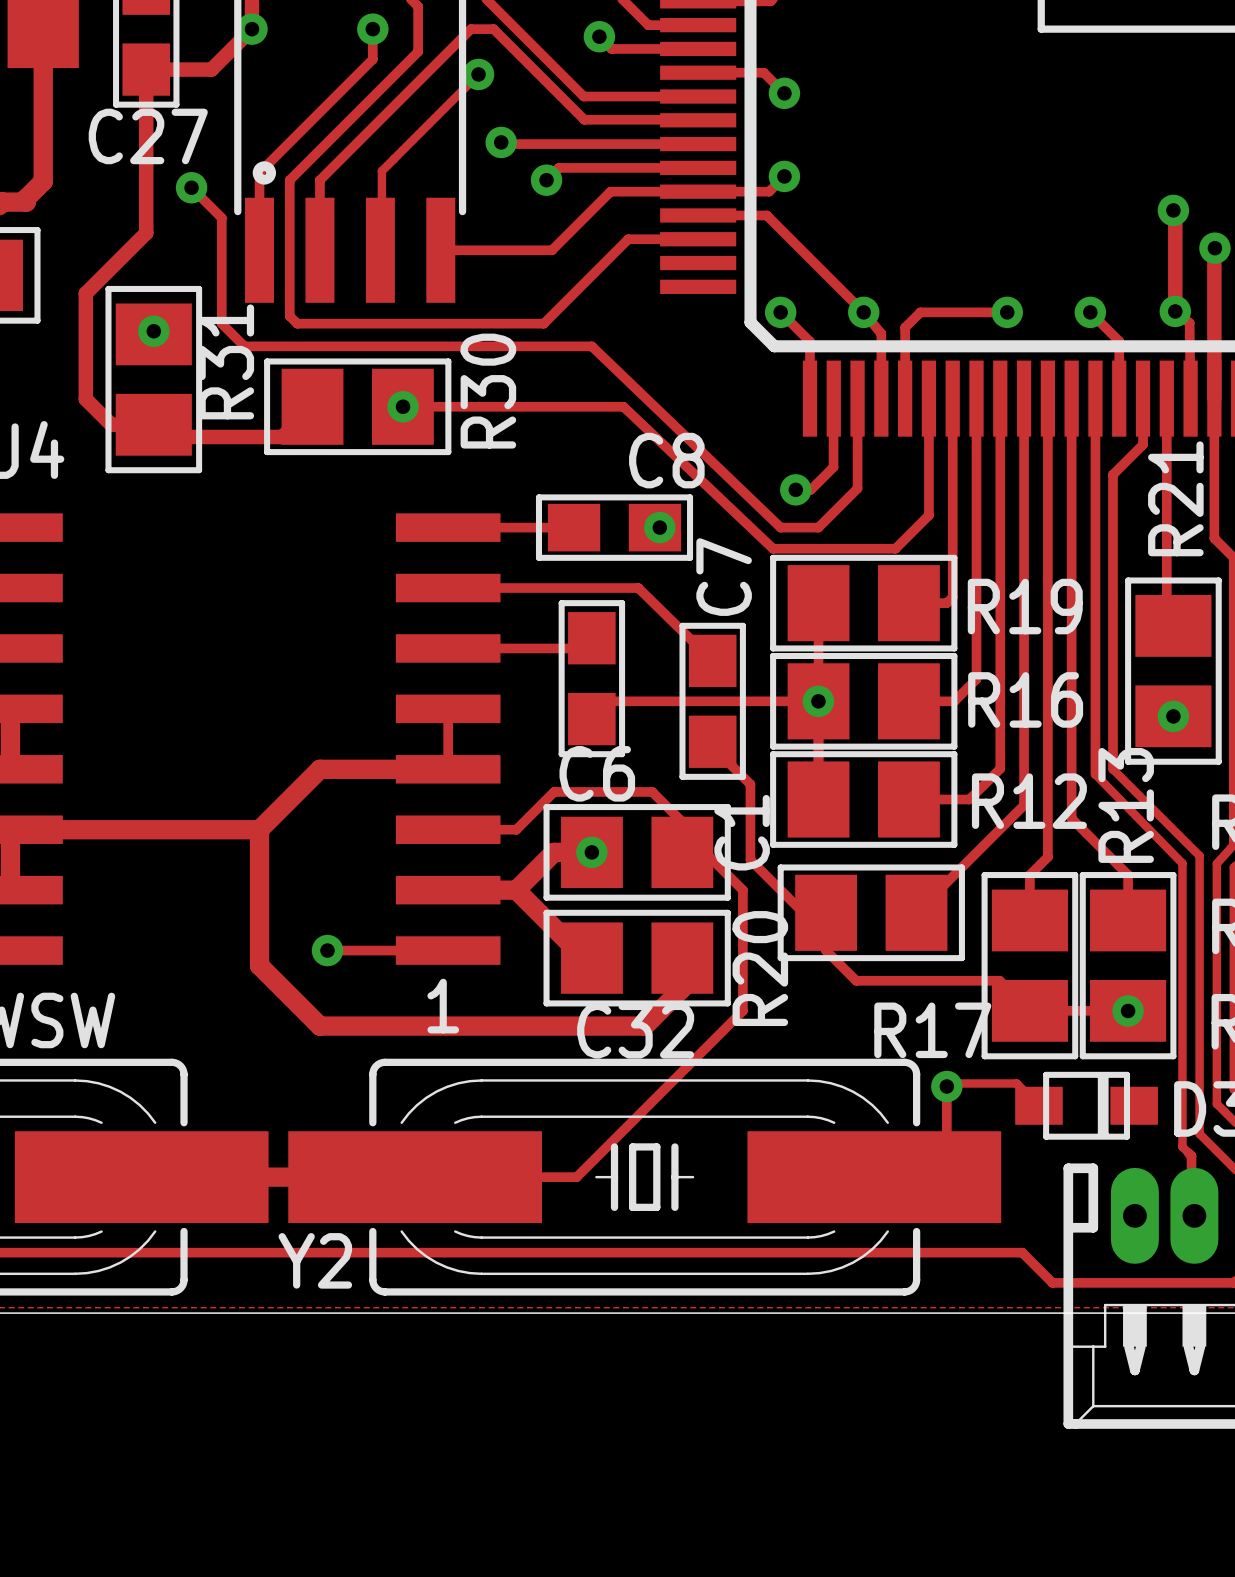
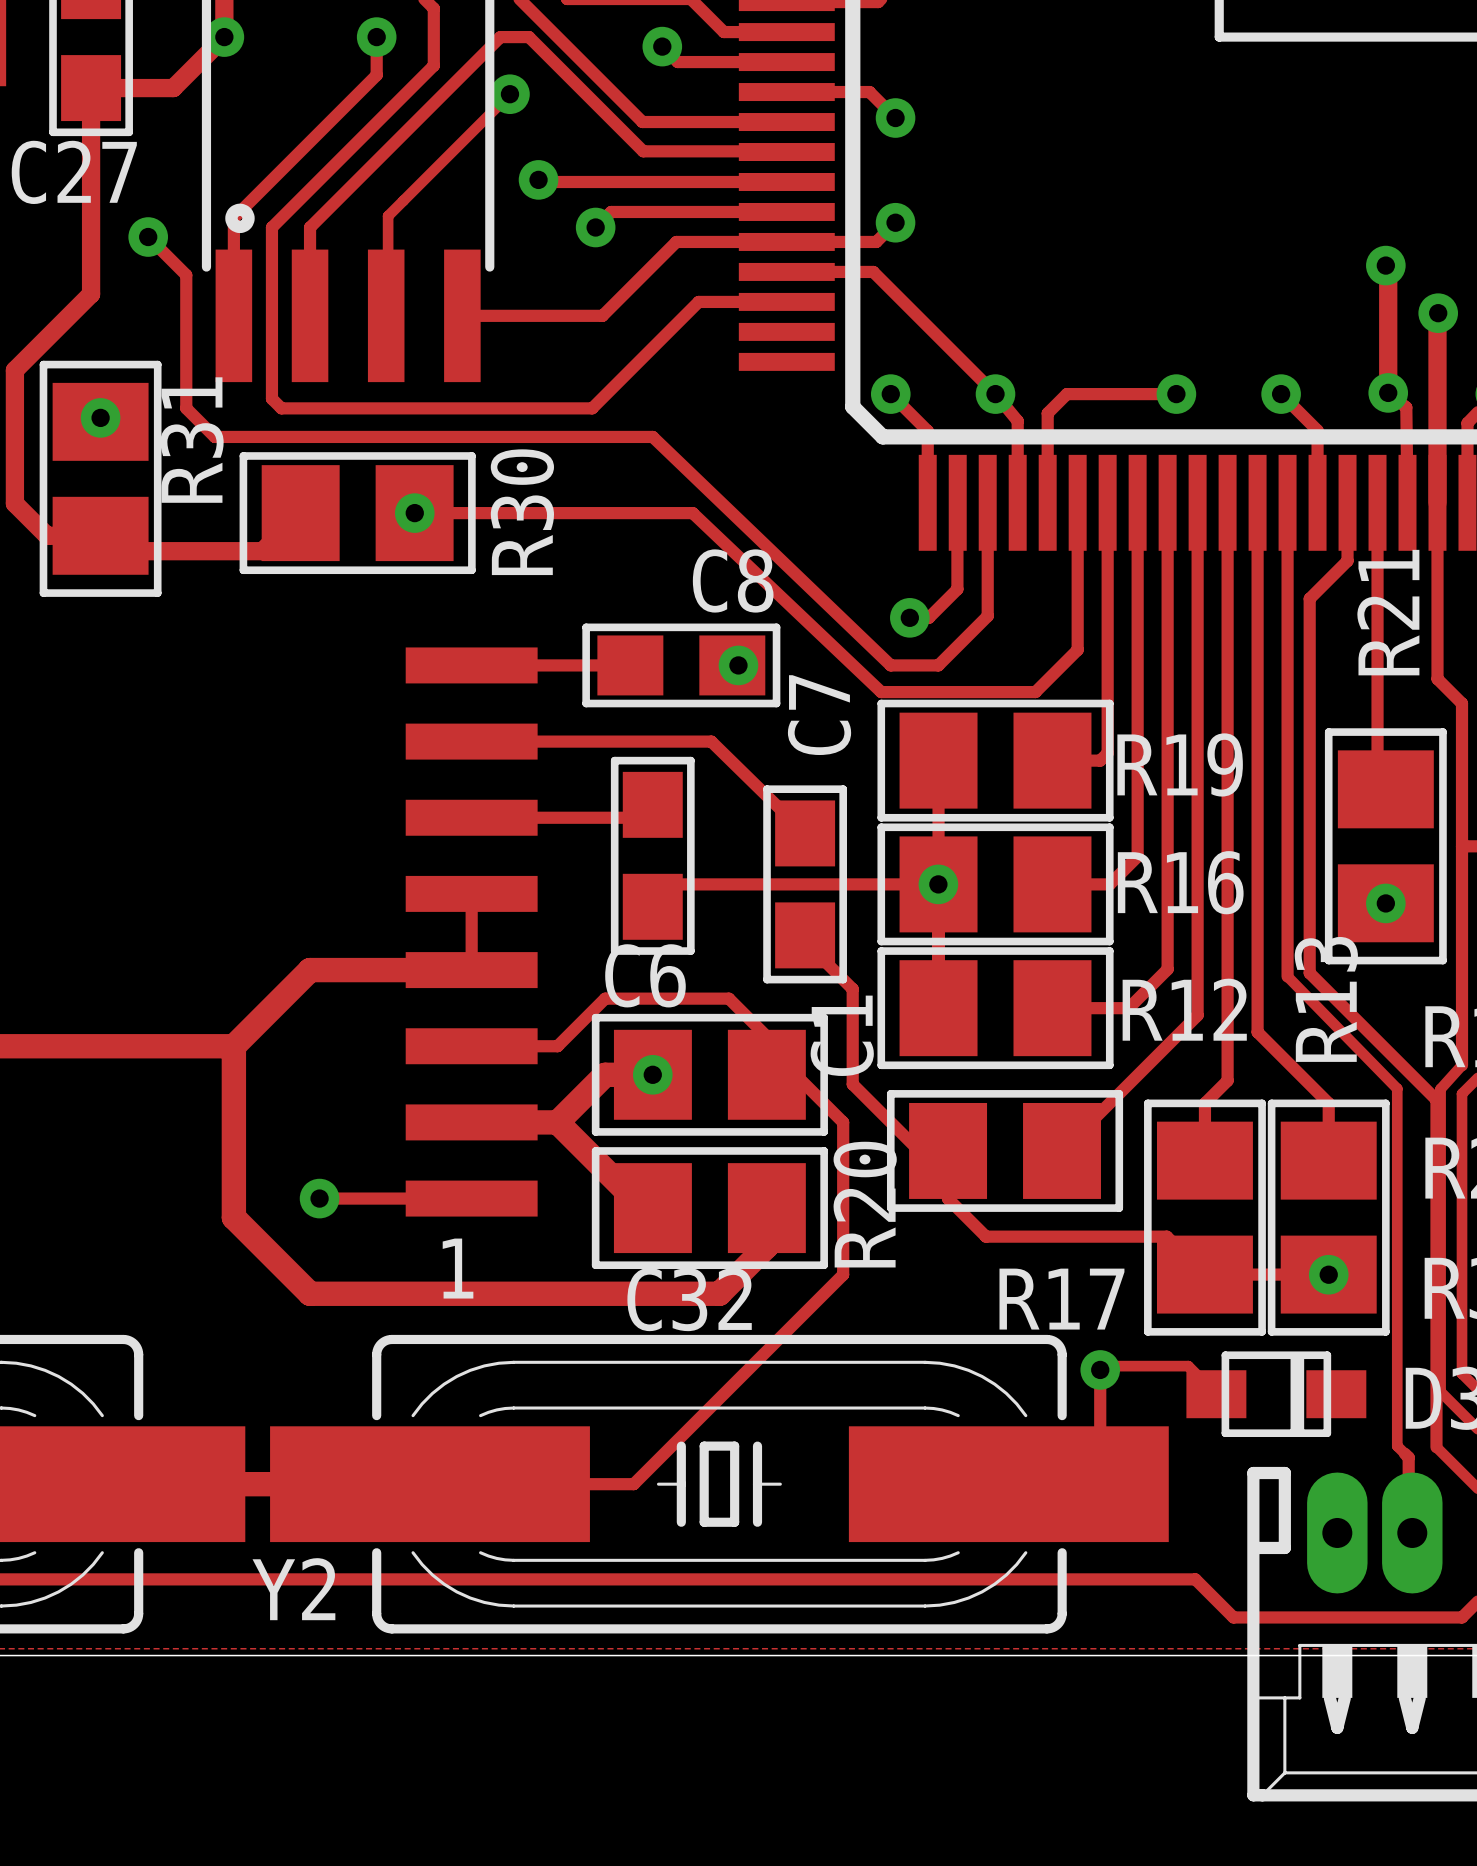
track: (1112, 769) (1199, 855) (1199, 1133) (1213, 1147) -> (1309, 970) (1309, 973) (1436, 1099) (1436, 1447)

